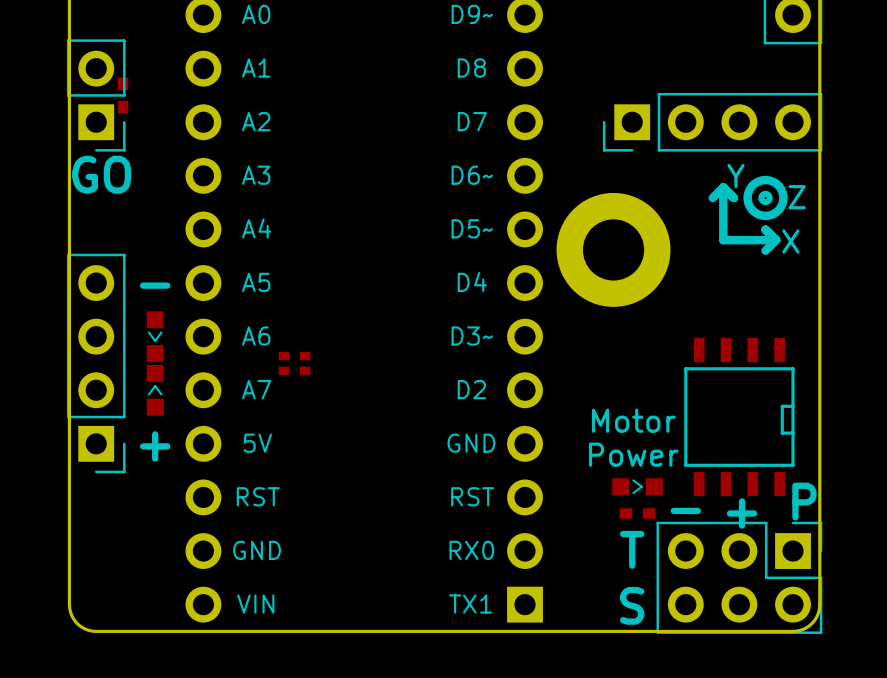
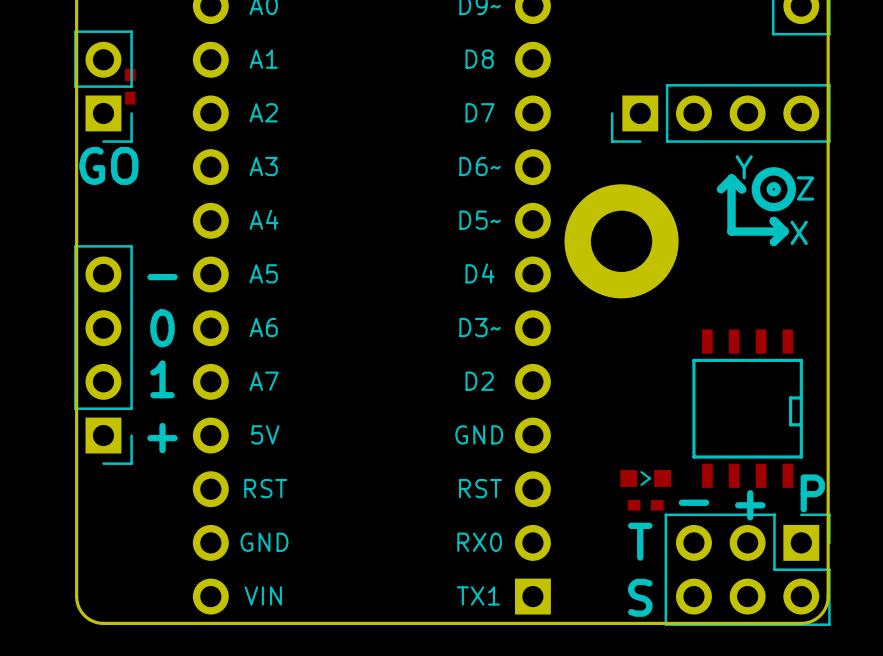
part: (155, 336) -> none
text: none -> 0 (162, 328)
part: (294, 363) -> none
text: none -> 1 (162, 379)
part: (155, 390) -> none
text: Motor (633, 420) -> none
text: Power (633, 454) -> none

